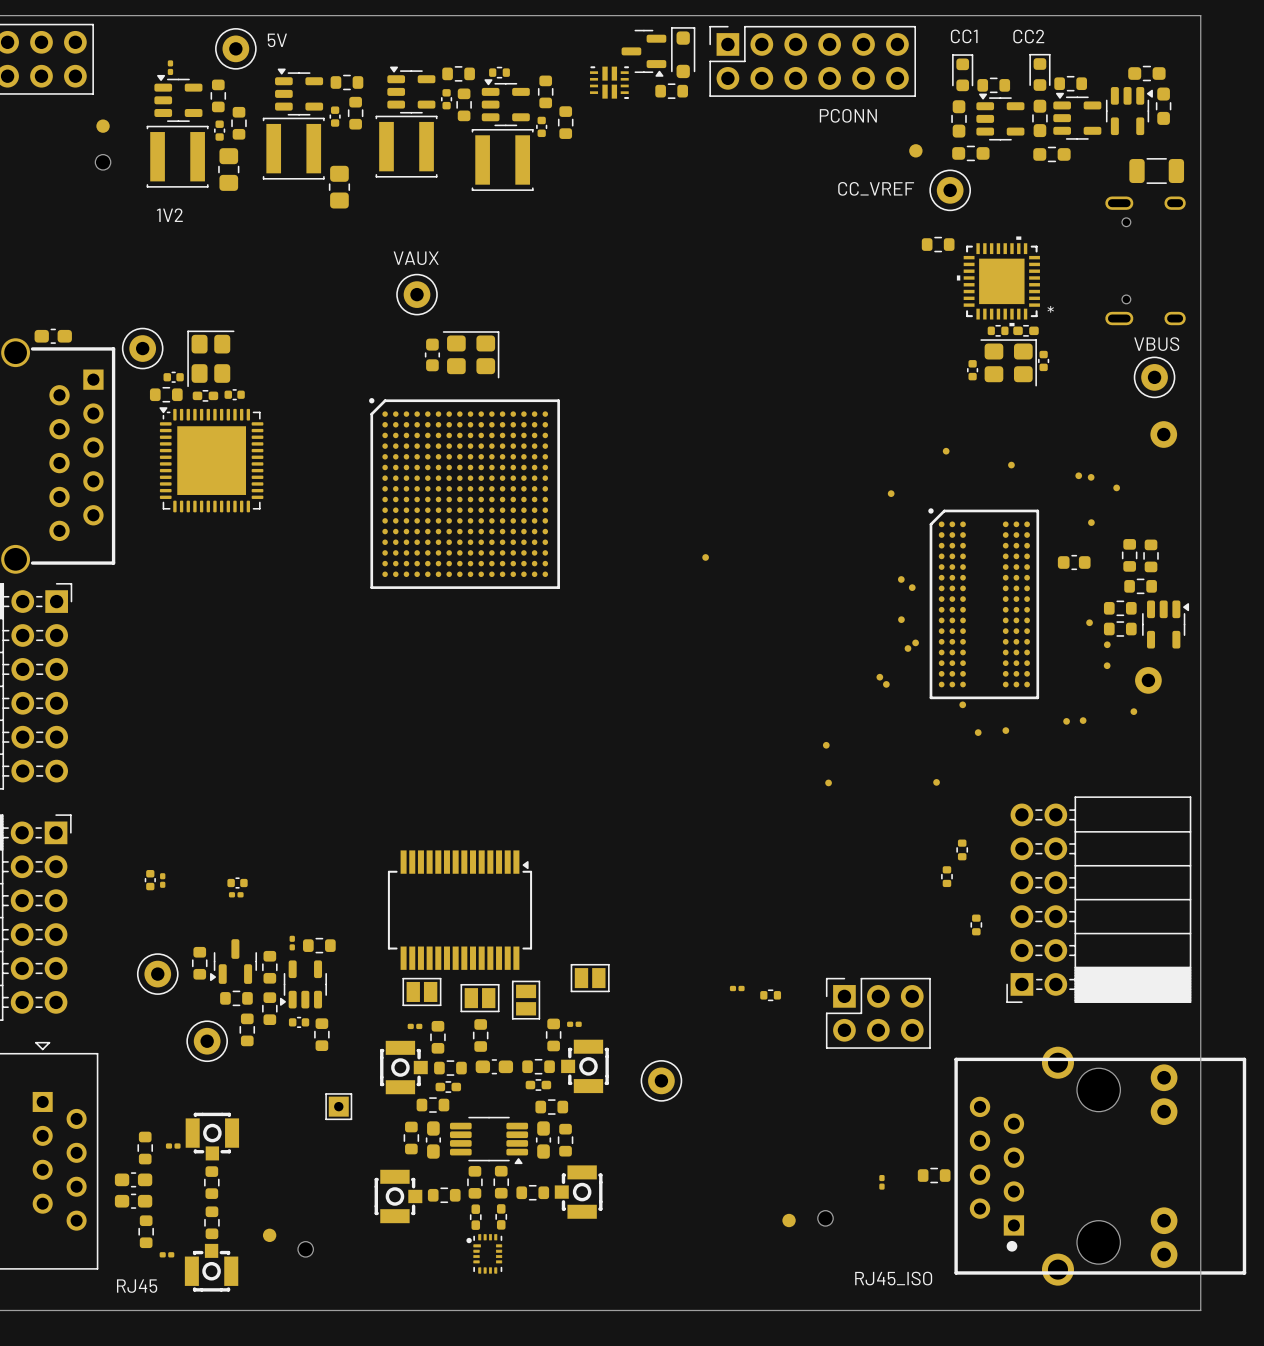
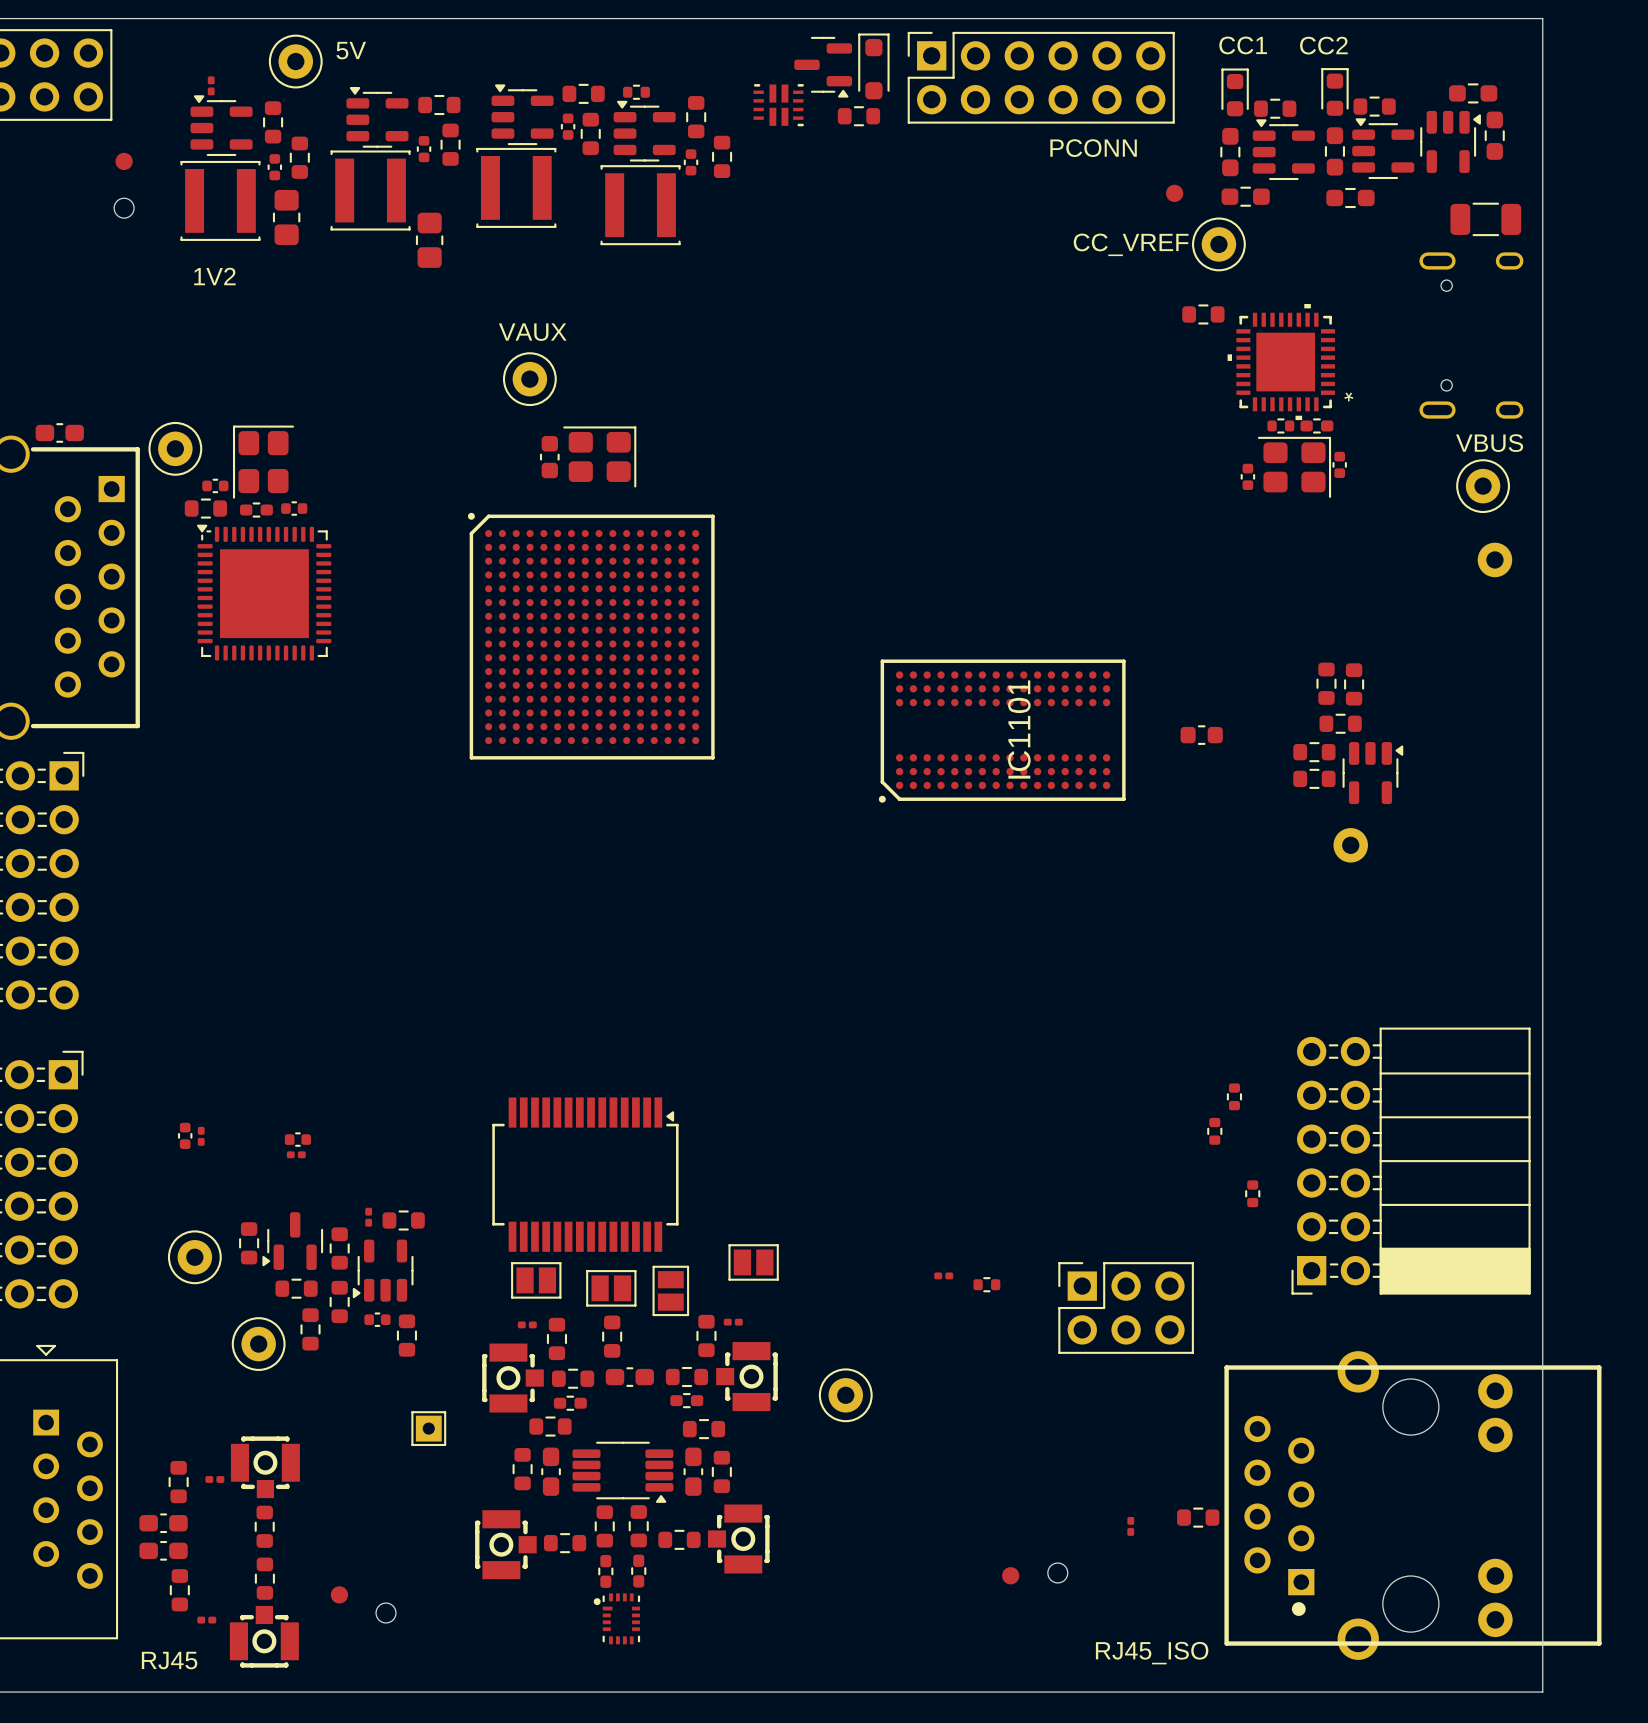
part: (946, 451) -> none
part: (1011, 465) -> none
part: (1078, 475) -> none
part: (1091, 477) -> none
part: (1116, 487) -> none
part: (891, 493) -> none
part: (1091, 522) -> none
part: none -> (1326, 683)
part: none -> (1354, 684)
part: (1129, 555) -> none
part: (1151, 555) -> none
part: (705, 557) -> none
part: none -> (1340, 723)
part position: (1074, 562) -> (1201, 735)
IC1101: none -> (1002, 731)
part: (901, 579) -> none
part: none -> (1314, 752)
part: (1140, 586) -> none
part: (912, 587) -> none
part: (983, 603) -> none
part: none -> (1314, 778)
part: (1120, 608) -> none
part: (901, 619) -> none
part: (1089, 622) -> none
part position: (1165, 624) -> (1372, 773)
part: (1120, 629) -> none
part: (915, 642) -> none
part: (1107, 644) -> none
part: (907, 648) -> none
part: (1107, 665) -> none
part: (879, 677) -> none
part position: (1148, 680) -> (1350, 845)
part: (886, 684) -> none
part: (962, 704) -> none
part: (1133, 711) -> none
part: (1083, 720) -> none
part: (1066, 721) -> none
part: (1005, 730) -> none
part: (978, 732) -> none
part: (826, 745) -> none
part: (828, 782) -> none
part: (936, 782) -> none

